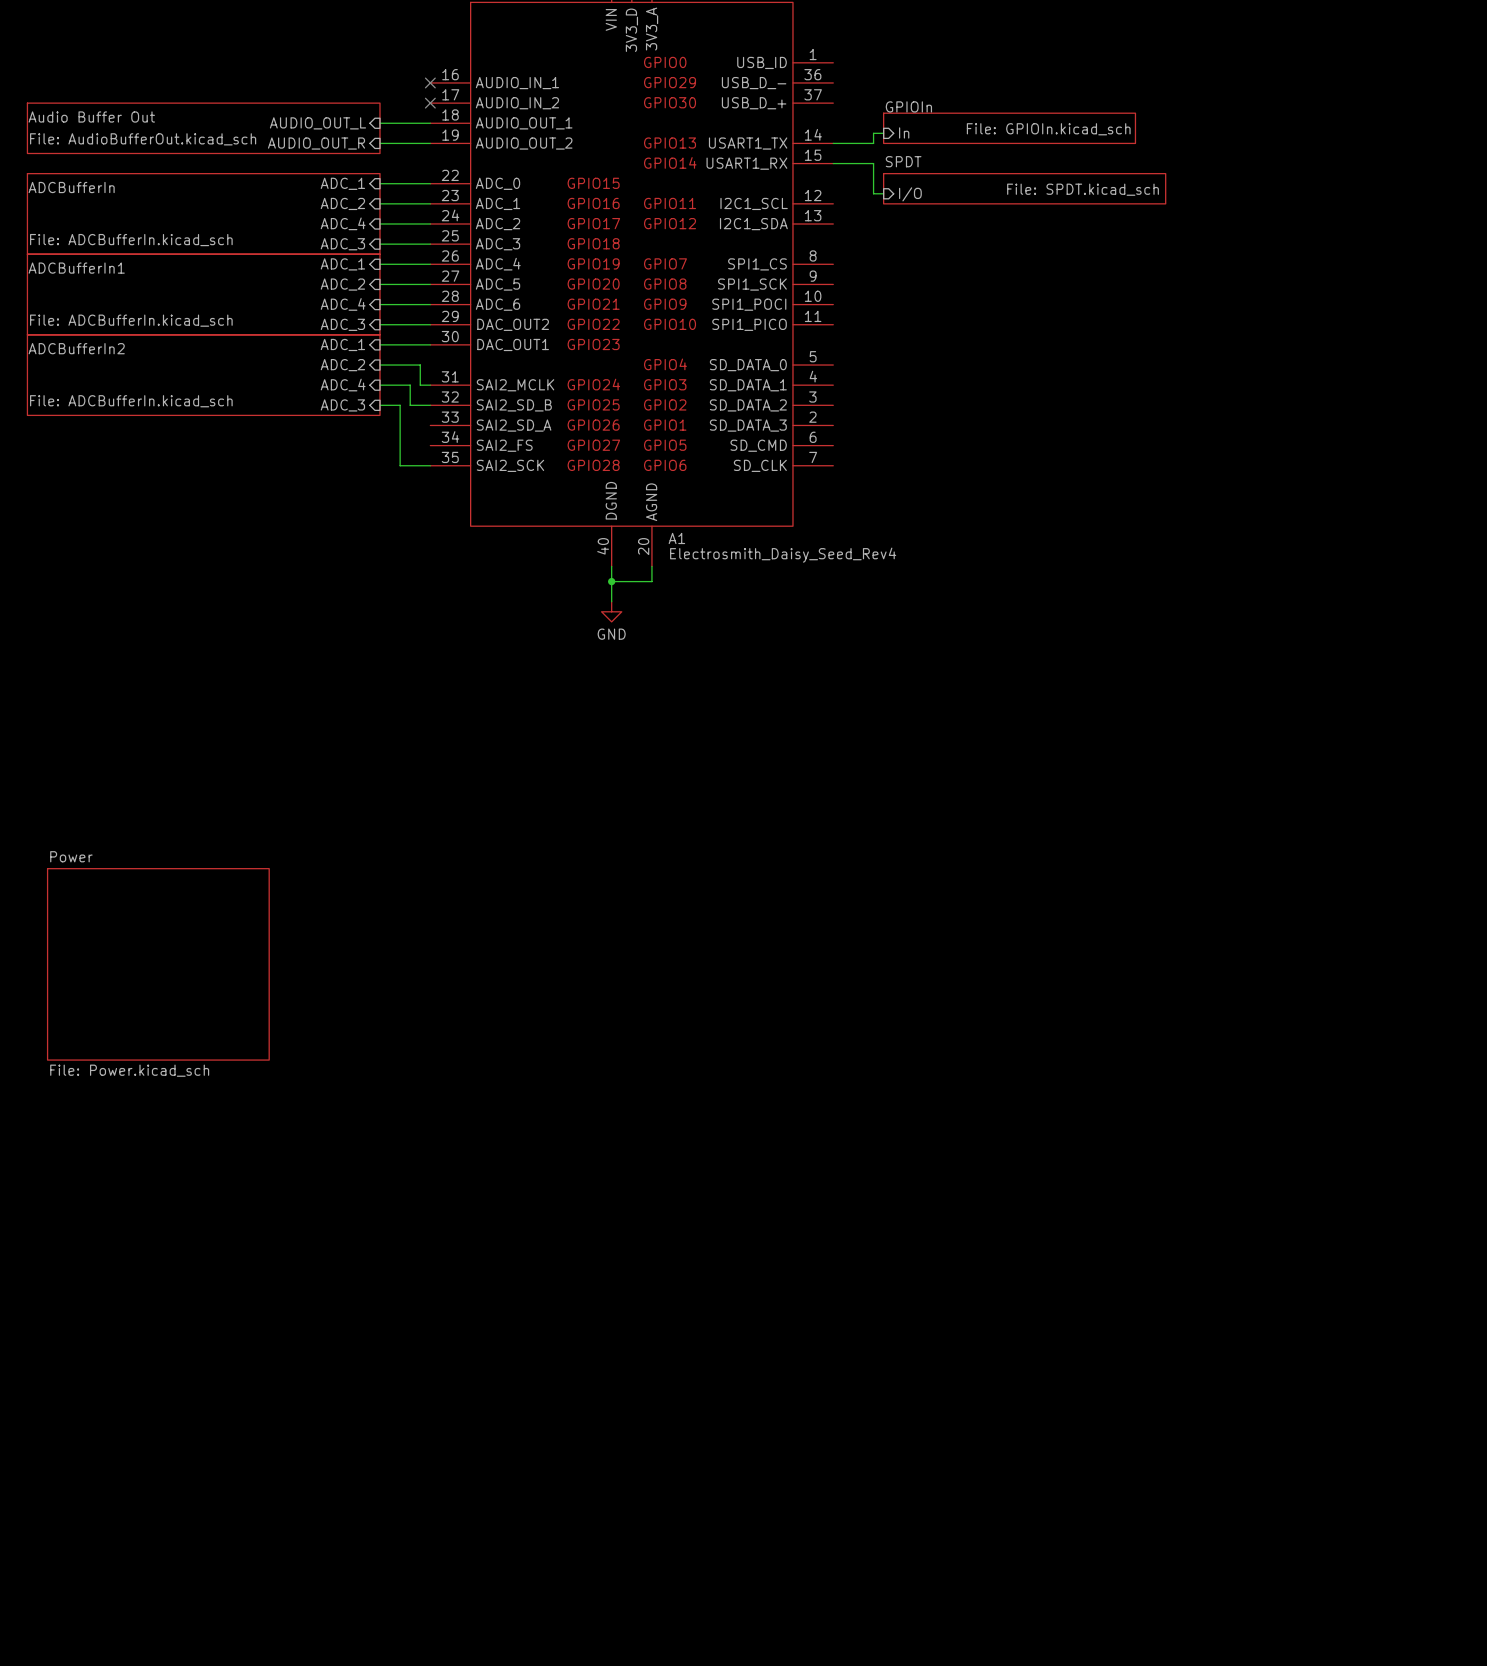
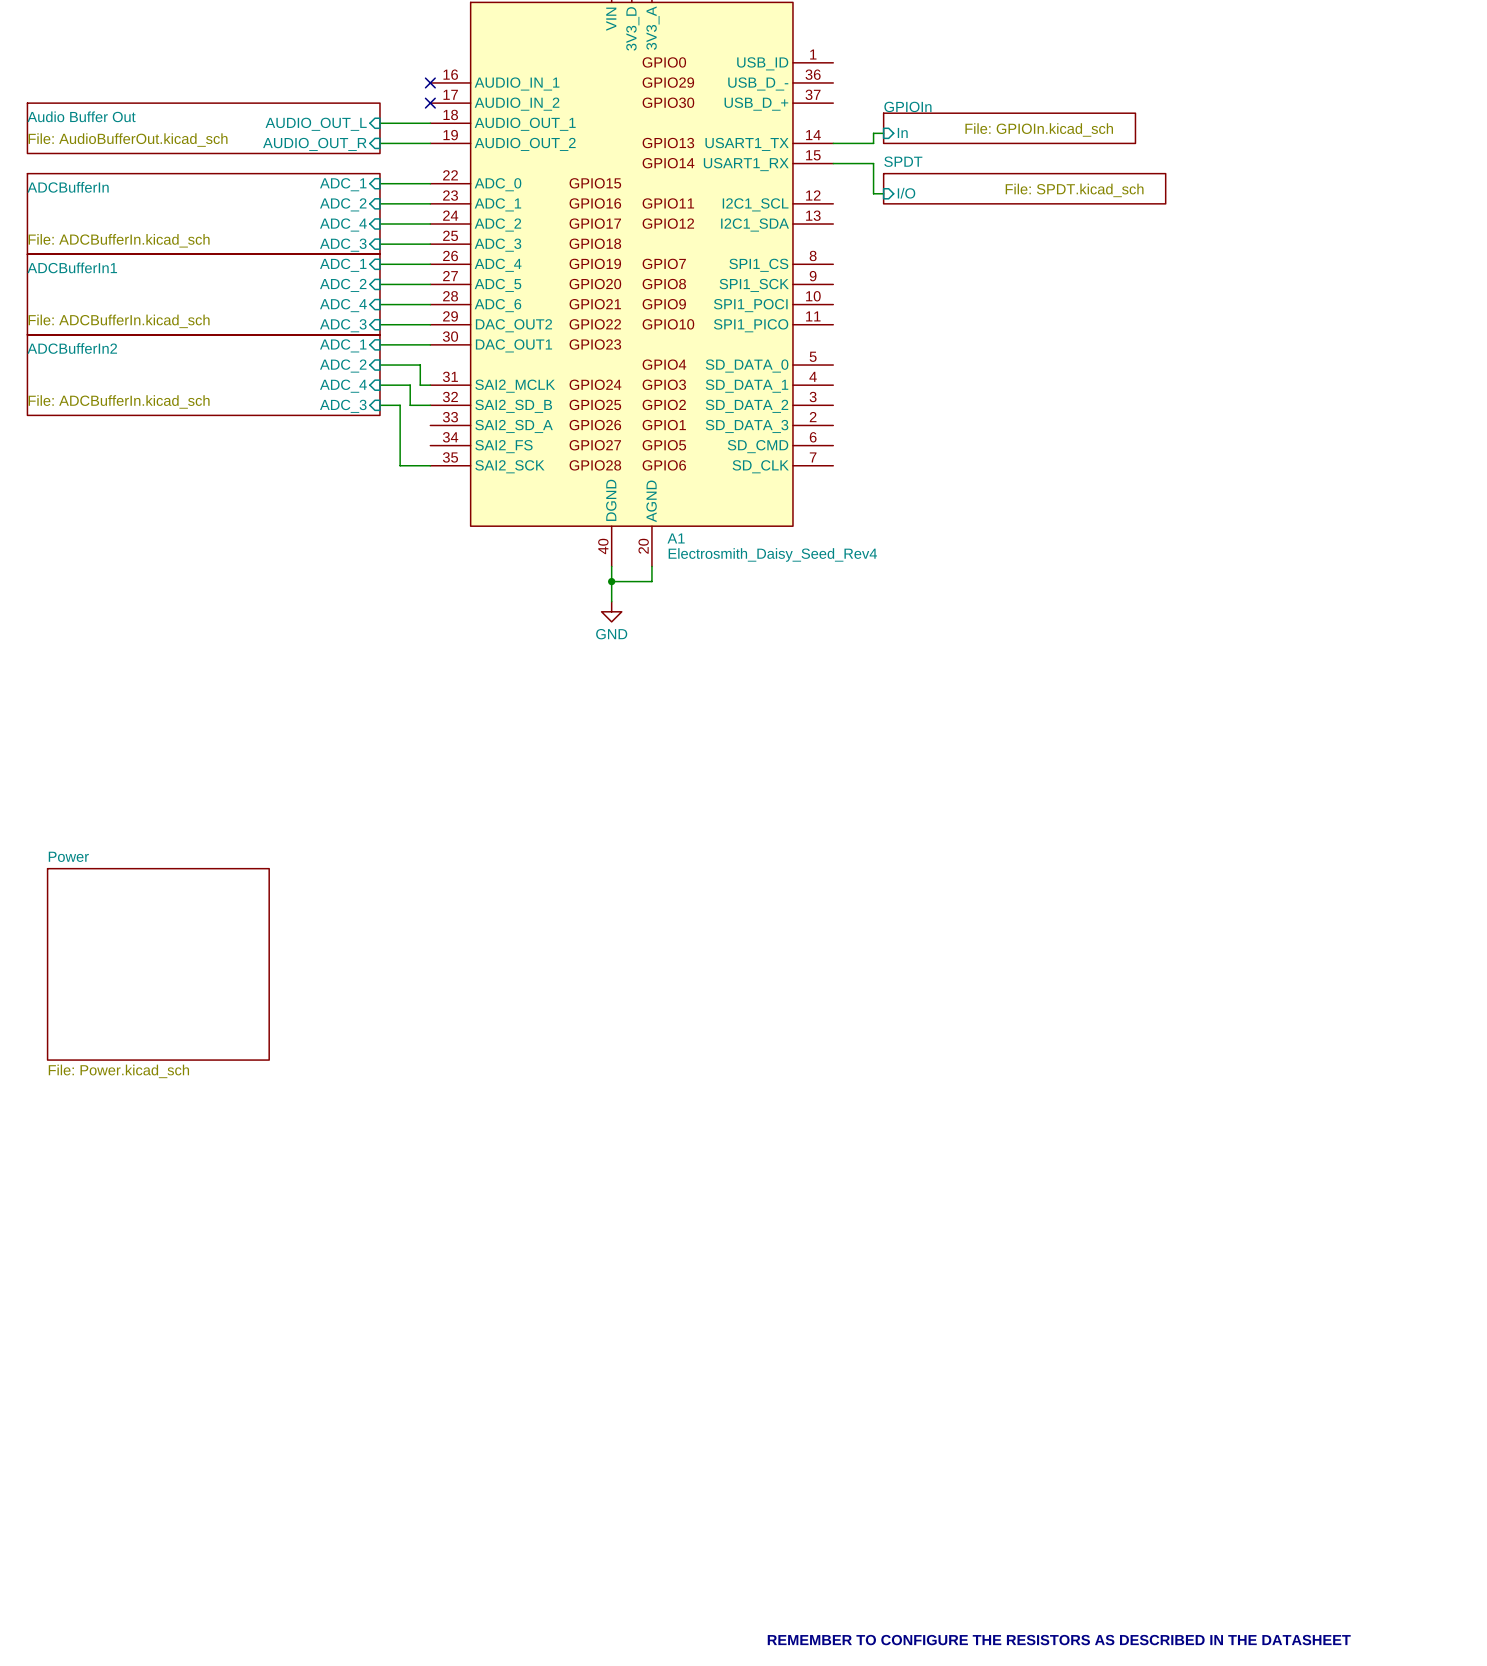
text: none -> REMEMBER TO CONFIGURE THE RESISTORS AS DESCRIBED IN THE DATASHEET (1059, 1640)

